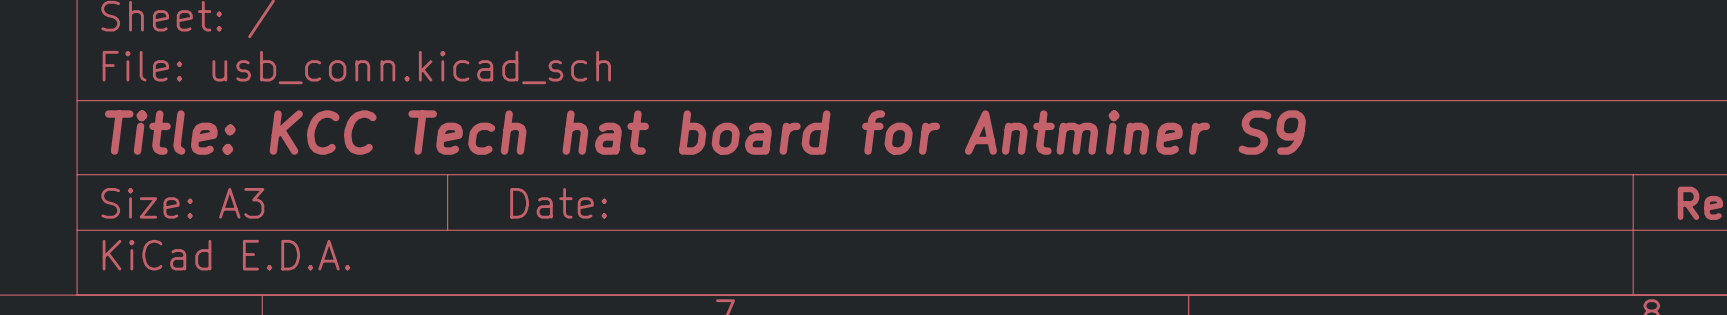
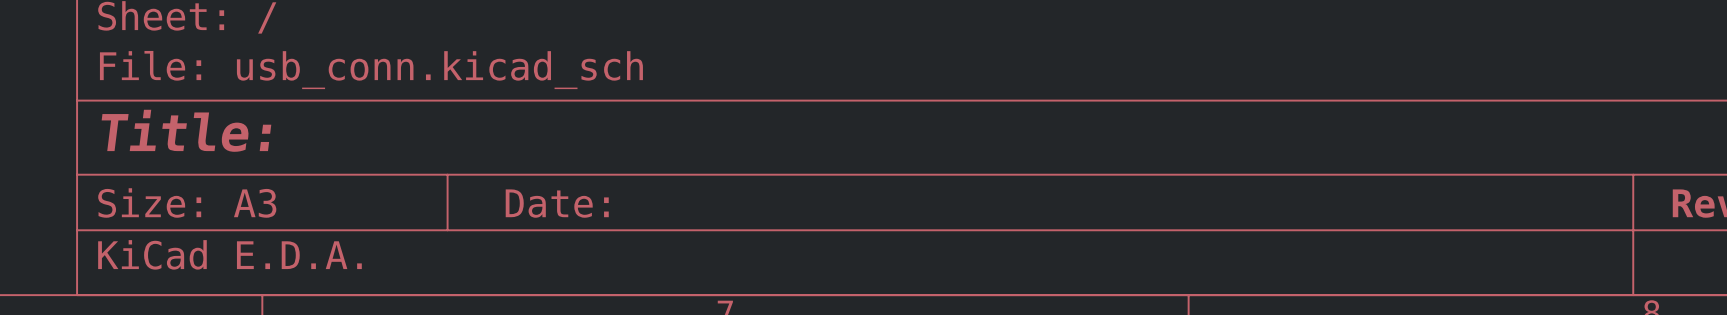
title block: Title: KCC Tech hat board for Antminer S9 (705, 132) -> Title: (186, 130)

